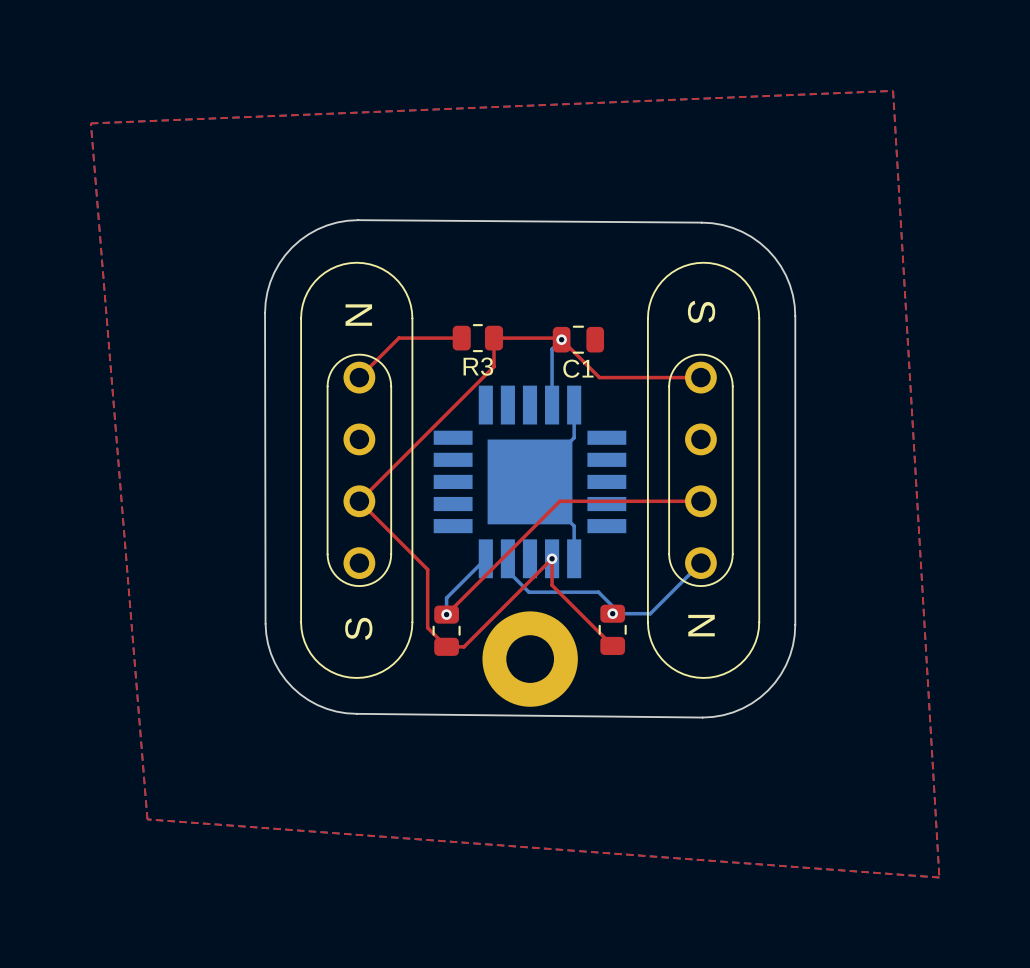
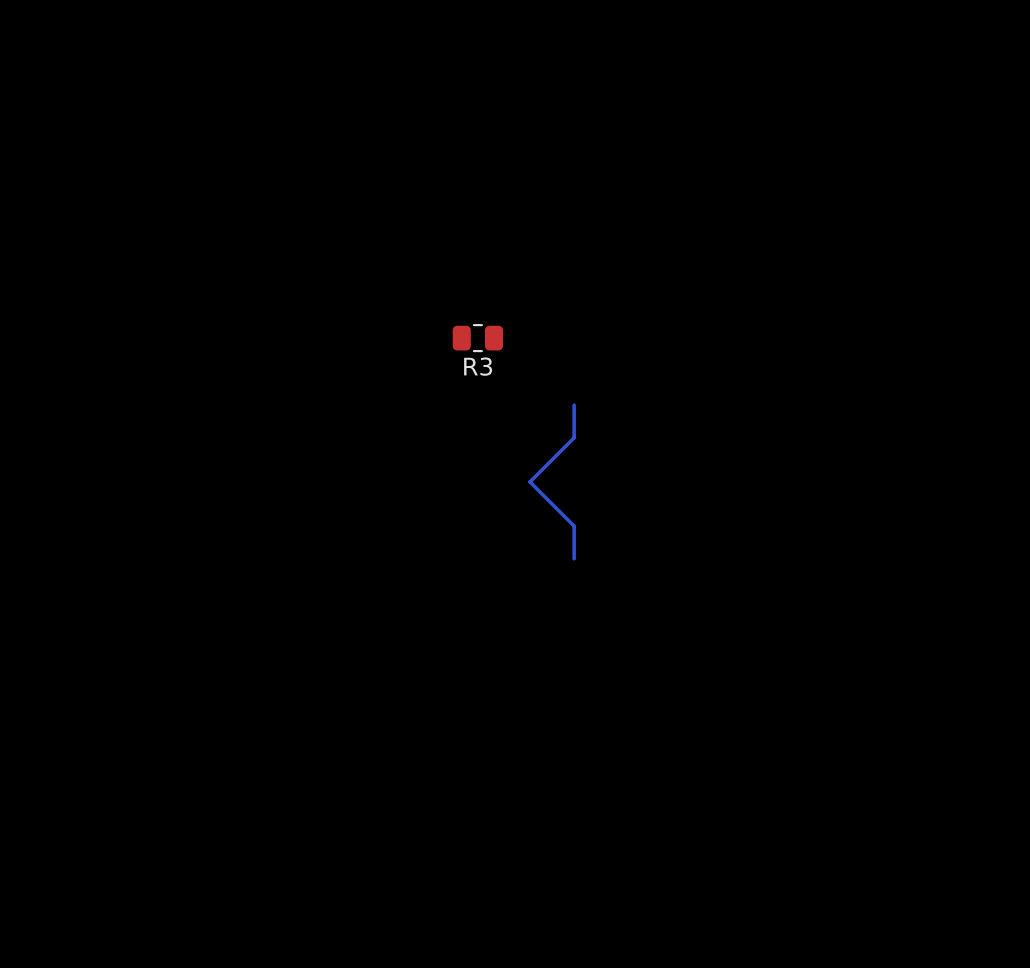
top zone outline: (893, 90) (90, 123) (147, 819) (939, 877) (893, 90) -> none
board edge: (357, 220) (712, 223) (732, 227) (751, 236) (774, 257) (790, 285) (795, 316) (795, 624) (792, 645) (786, 665) (775, 682) (760, 697) (733, 712) (702, 717) (356, 713) (336, 711) (317, 705) (300, 694) (285, 680) (270, 653) (265, 623) (265, 302) (274, 272) (285, 255) (300, 240) (327, 225) (357, 220) -> none
top track: (461, 338) (398, 338) (359, 377) -> none
bottom track: (561, 339) (552, 349) (552, 405) -> none
via: (561, 339) -> none
C1: (578, 339) -> none
top track: (700, 377) (599, 377) (560, 338) (493, 338) (493, 366) (359, 501) -> none
part: (356, 470) -> none
part: (703, 470) -> none
part: (529, 481) -> none
top track: (359, 501) (427, 569) (427, 627) (446, 646) (464, 646) (552, 558) (552, 585) (612, 645) -> none
top track: (700, 501) (559, 501) (446, 614) -> none
bottom track: (485, 558) (446, 598) (446, 614) -> none
bottom track: (507, 558) (507, 571) (528, 592) (598, 592) (612, 606) (612, 613) (650, 613) (700, 563) -> none
via: (552, 558) -> none
via: (612, 613) -> none
via: (446, 614) -> none
part: (612, 629) -> none
part: (446, 630) -> none
part: (530, 659) -> none

